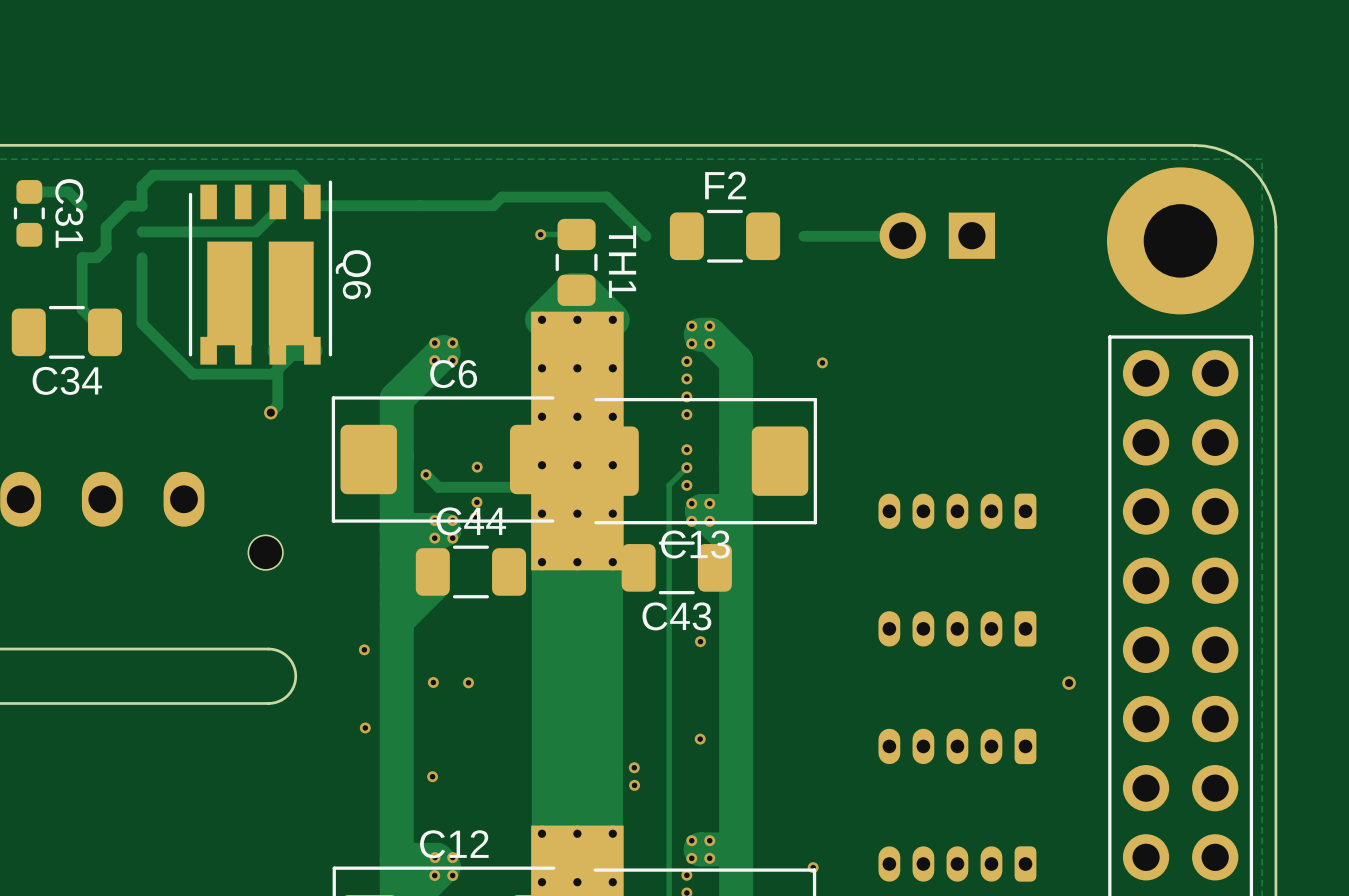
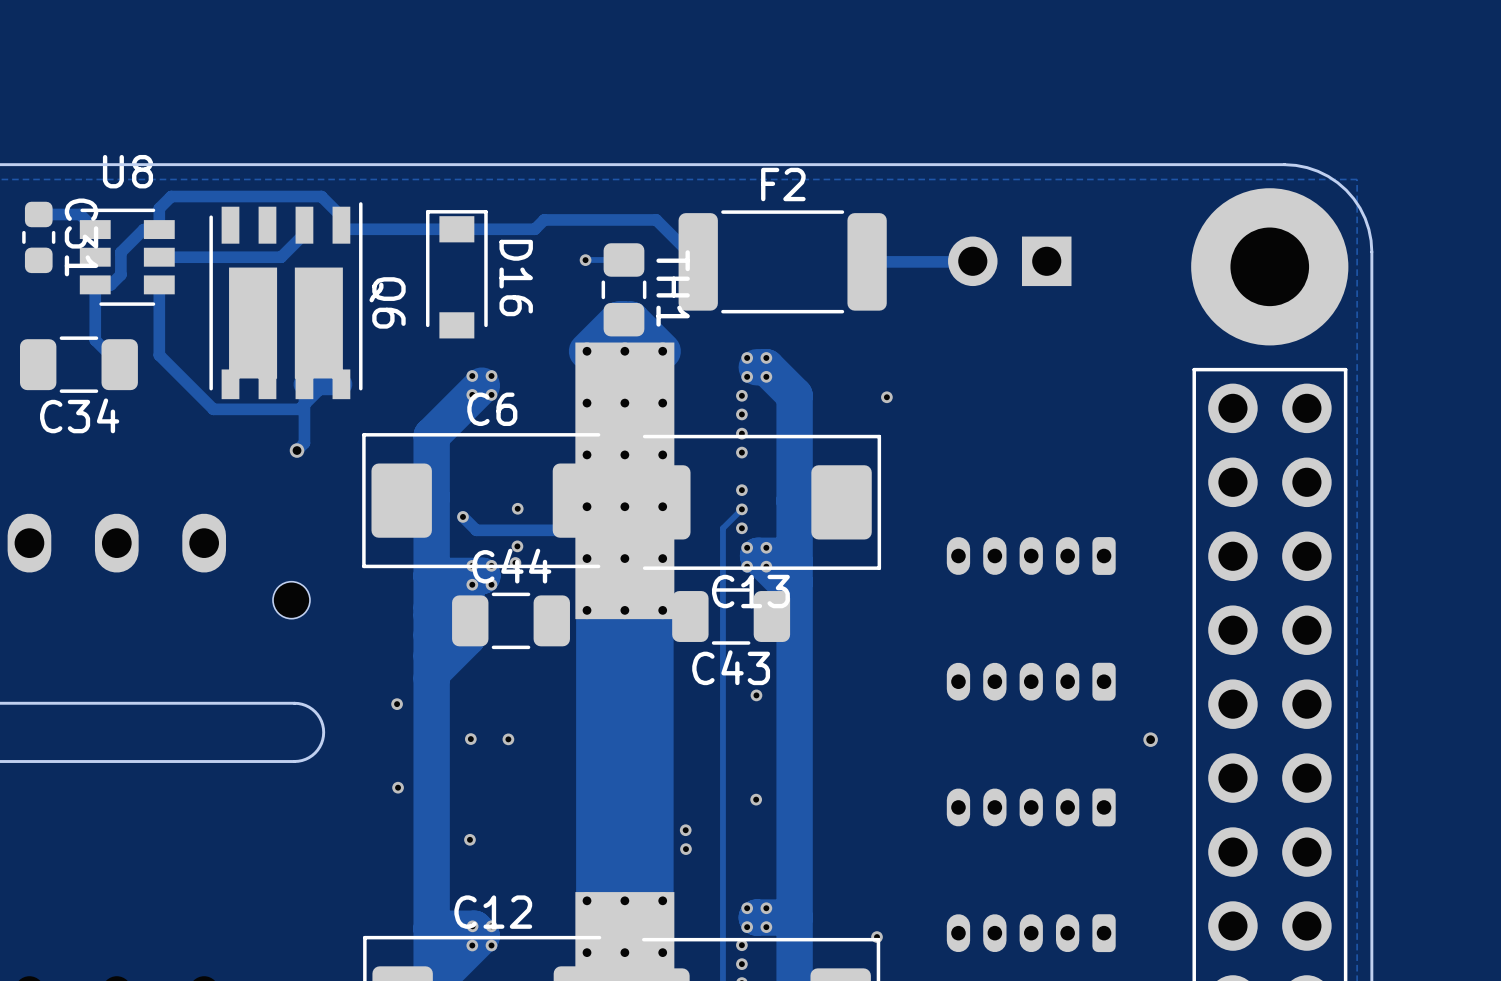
F2 footprint: [669, 209, 781, 263] -> [678, 210, 887, 314]
U8: none -> (127, 257)
D16: none -> (456, 274)

